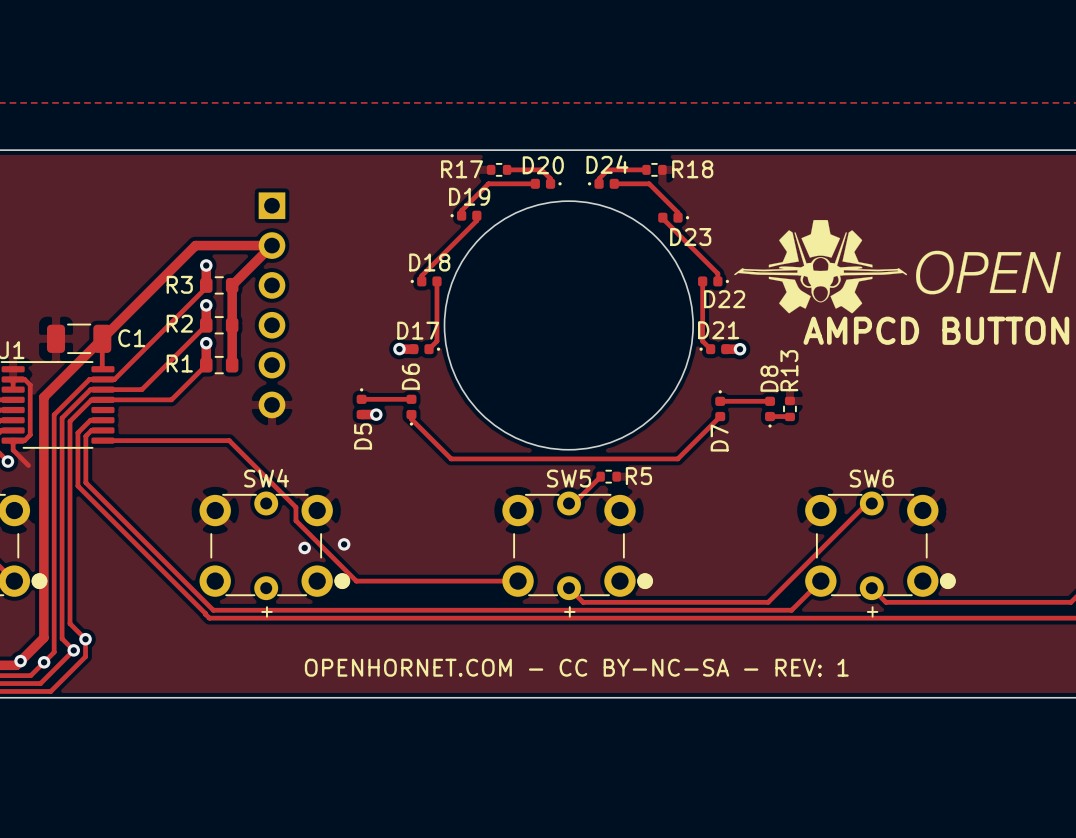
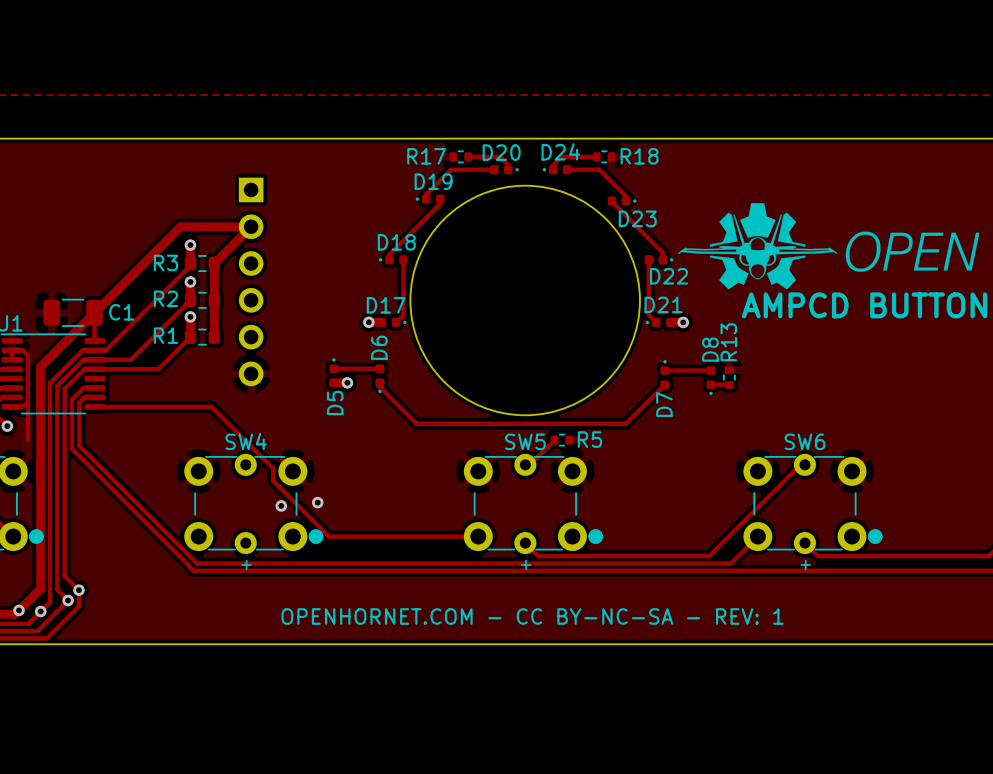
track: none -> (27, 401) (27, 440)
track: (13, 440) (13, 450) (28, 465) -> none

